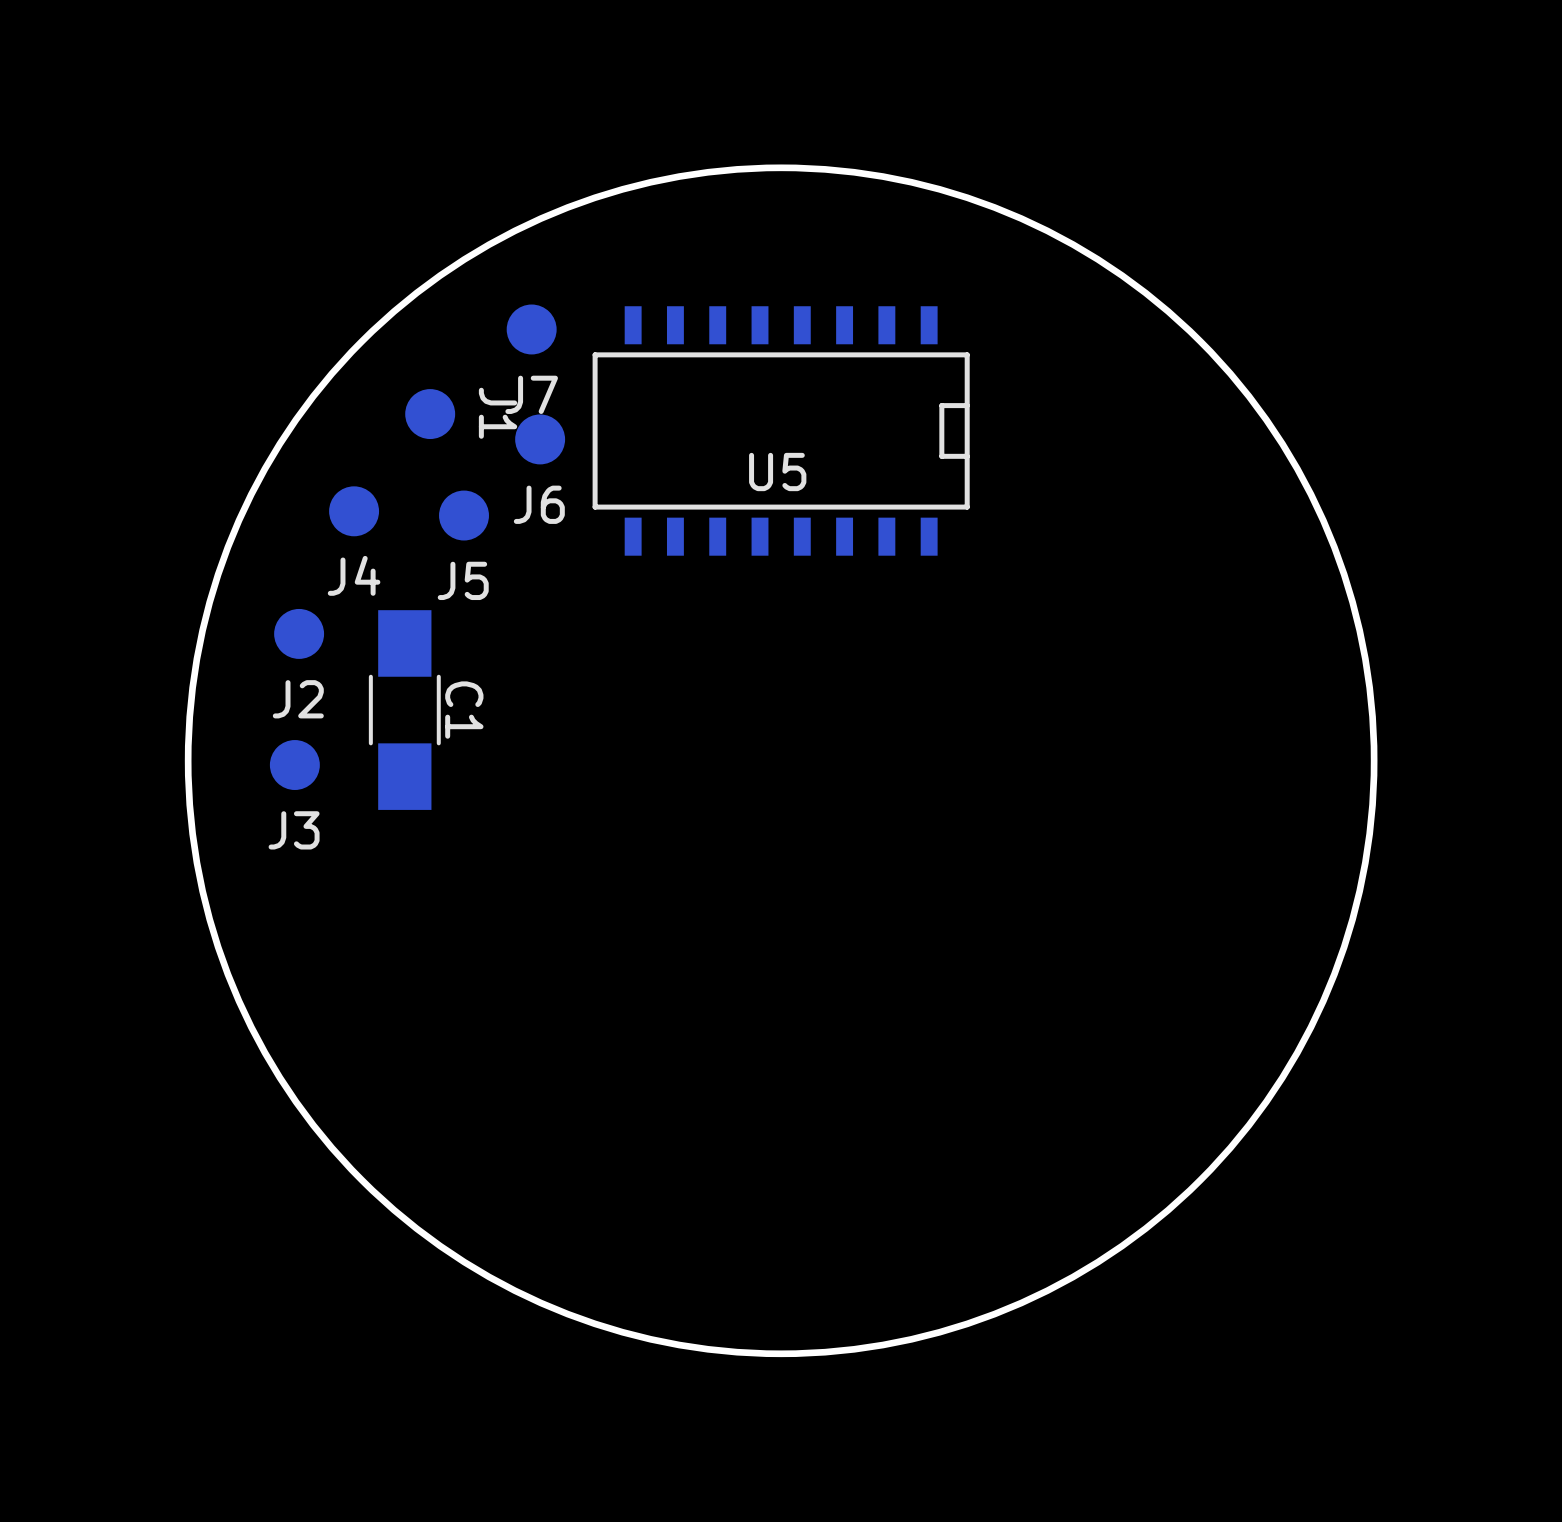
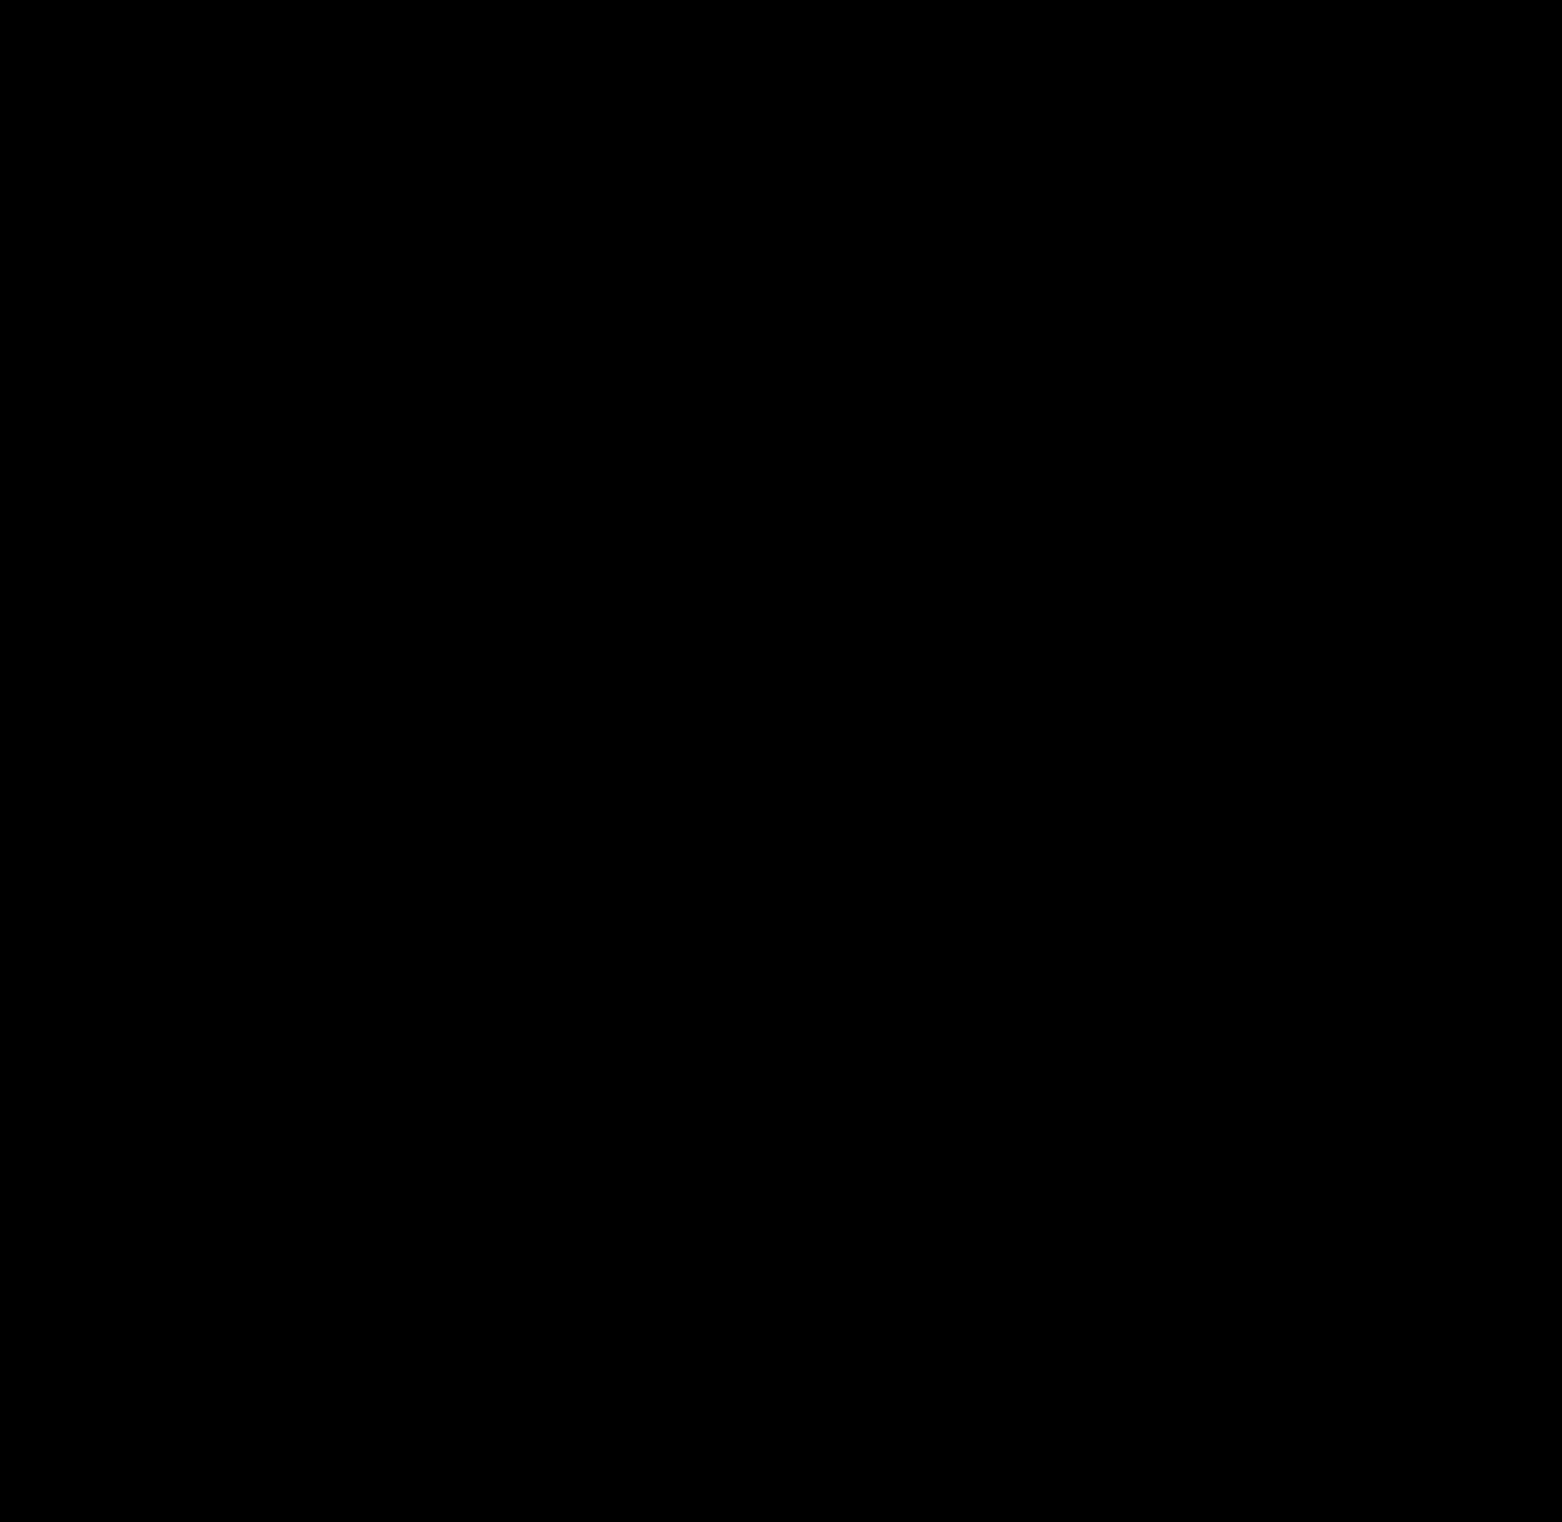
round board edge: [184, 164, 1378, 1358] -> none
J7: (531, 329) -> none
J1: (430, 414) -> none
U5: (781, 430) -> none
J6: (540, 439) -> none
J4: (354, 511) -> none
J5: (464, 515) -> none
J2: (299, 633) -> none
C1: (404, 710) -> none
J3: (294, 765) -> none

